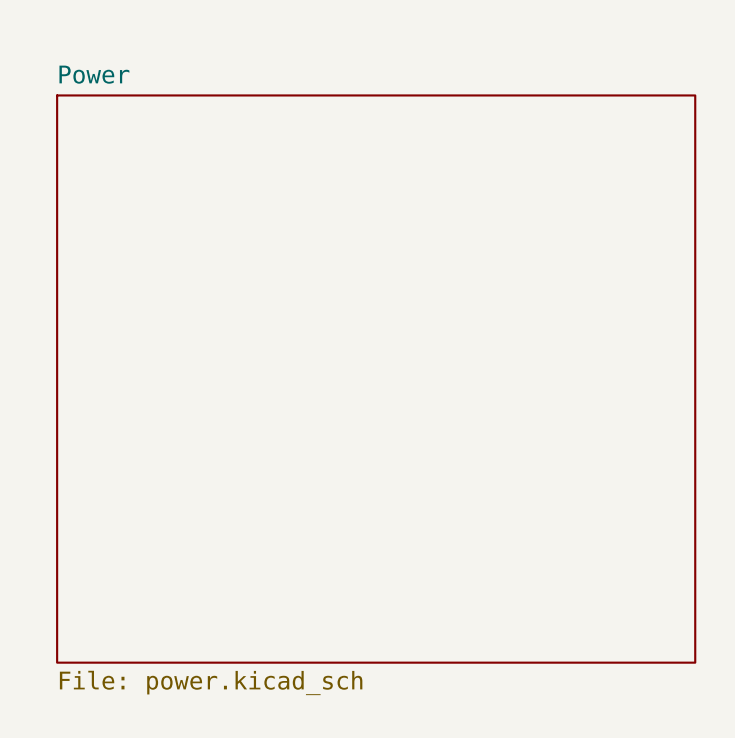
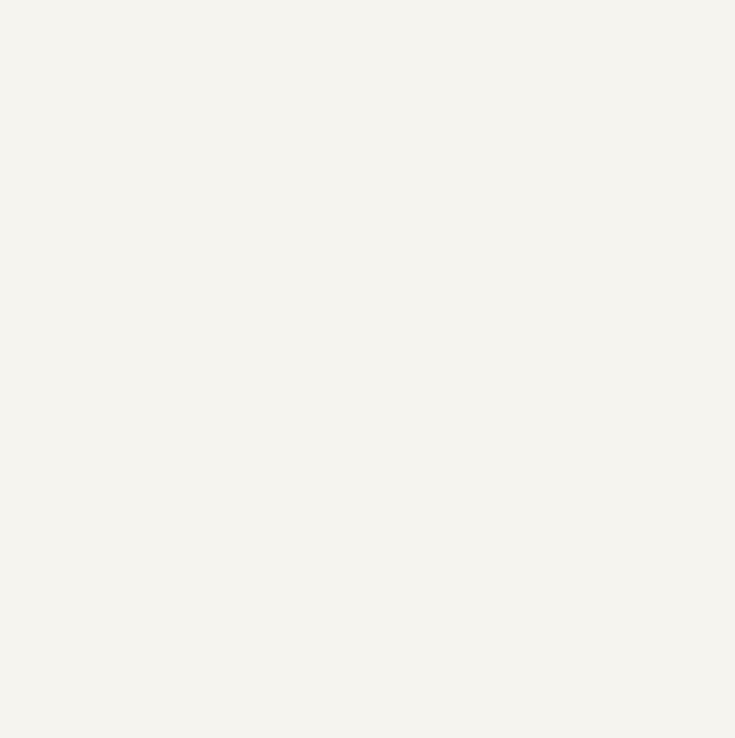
sheet Power: File: power.kicad_sch (376, 379) -> none

